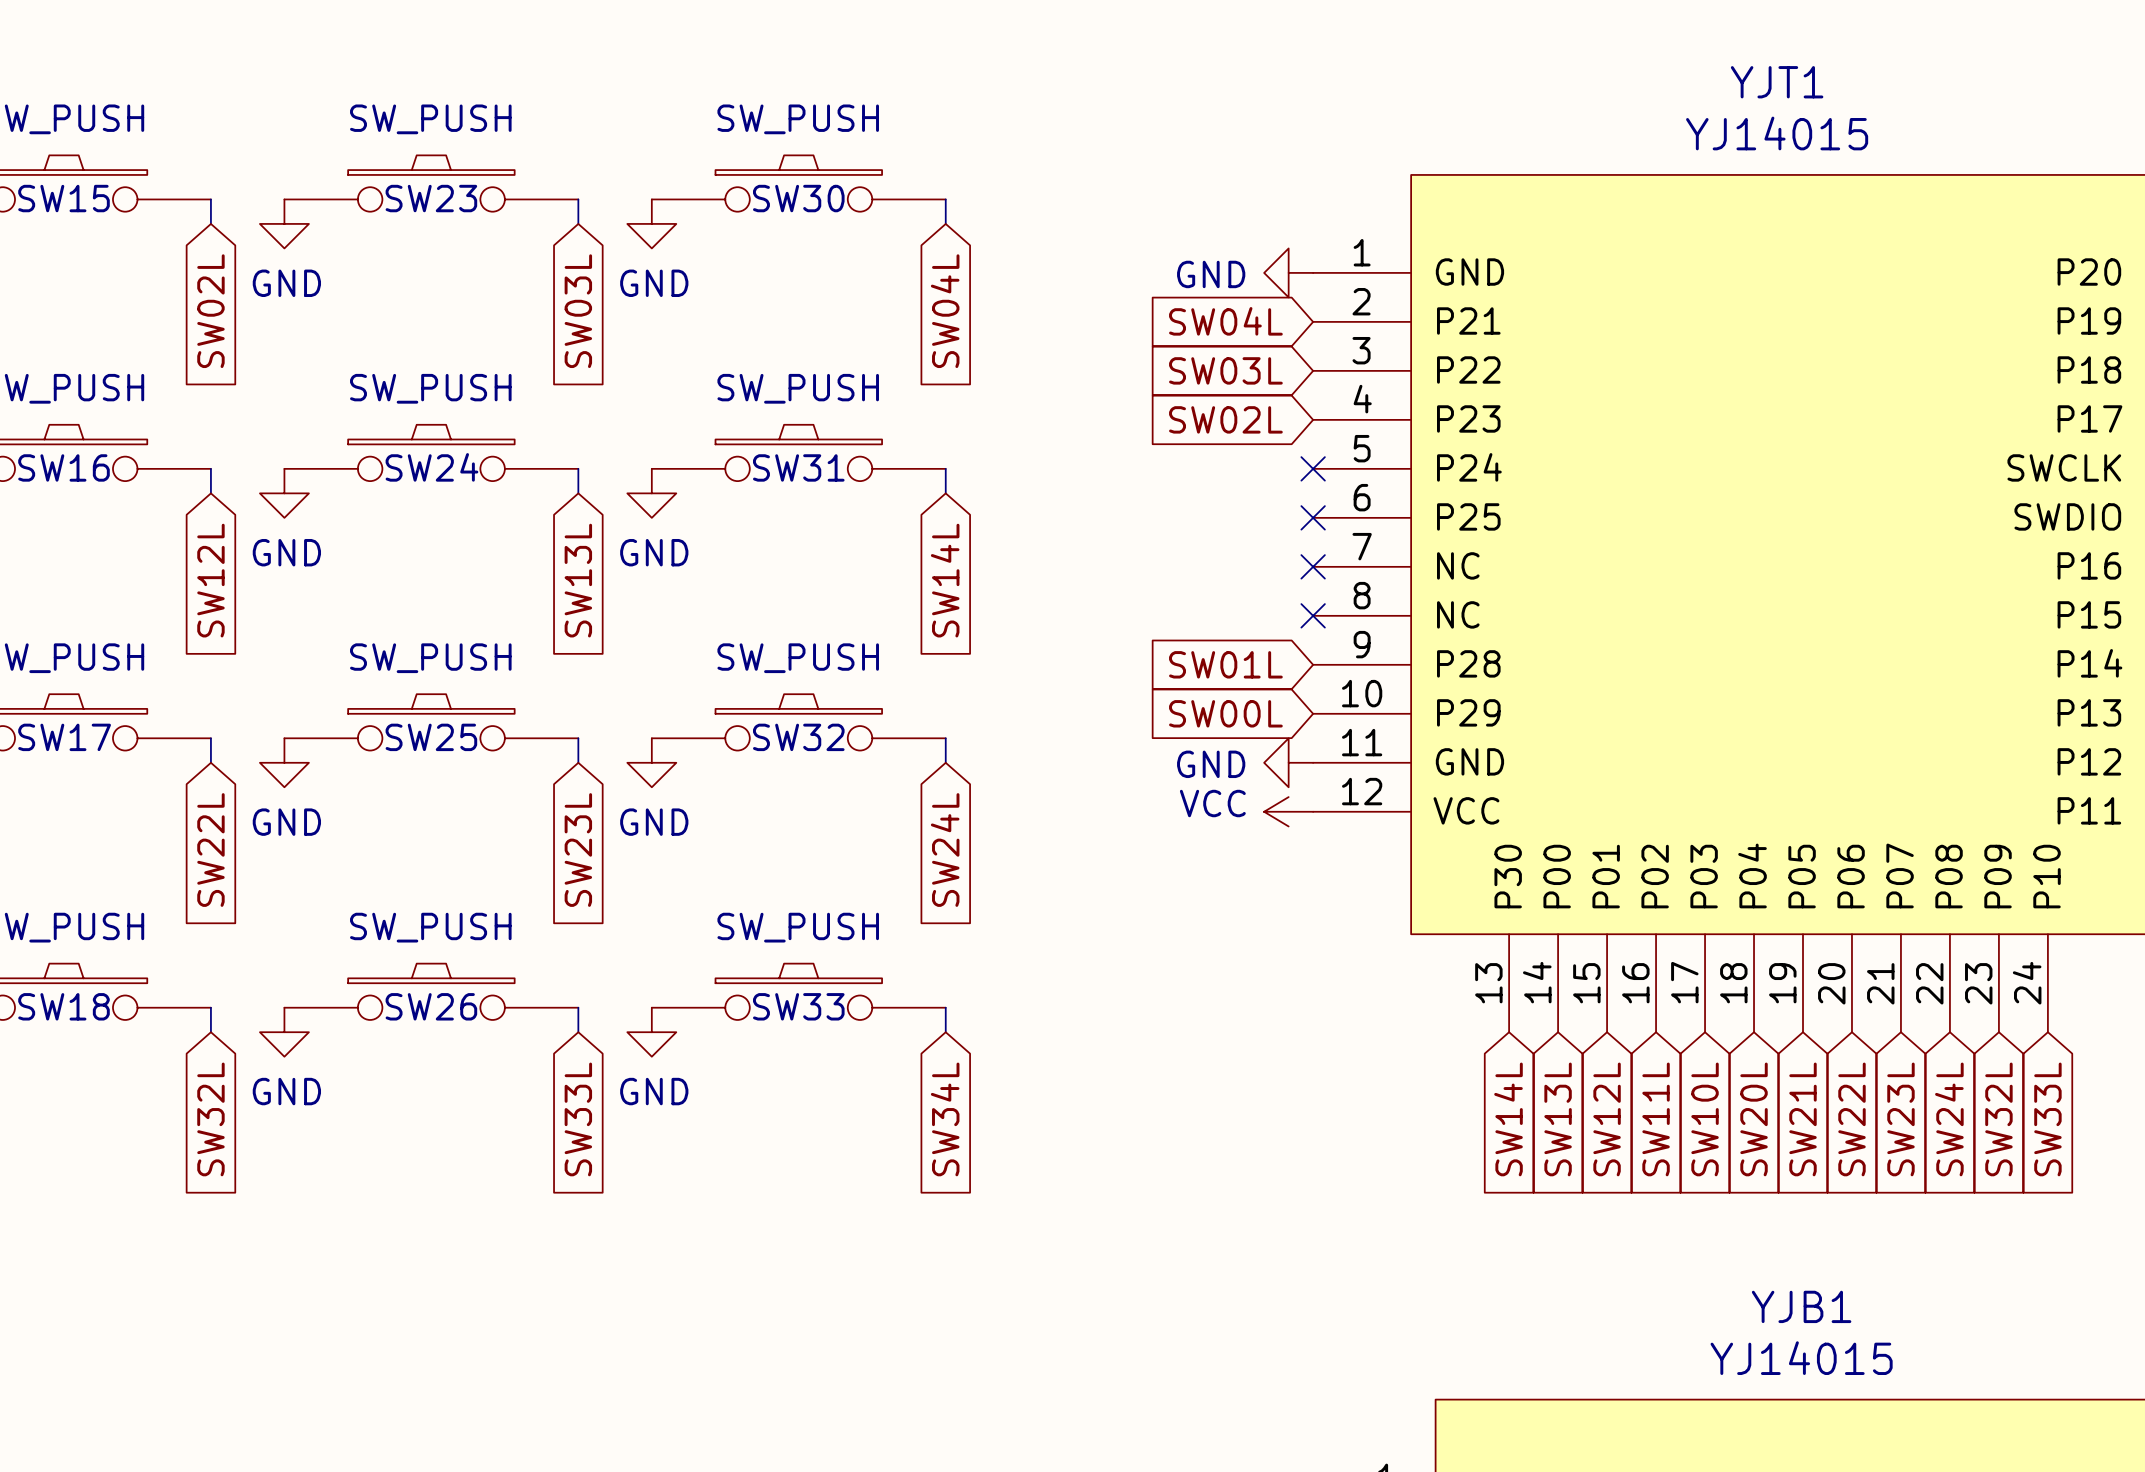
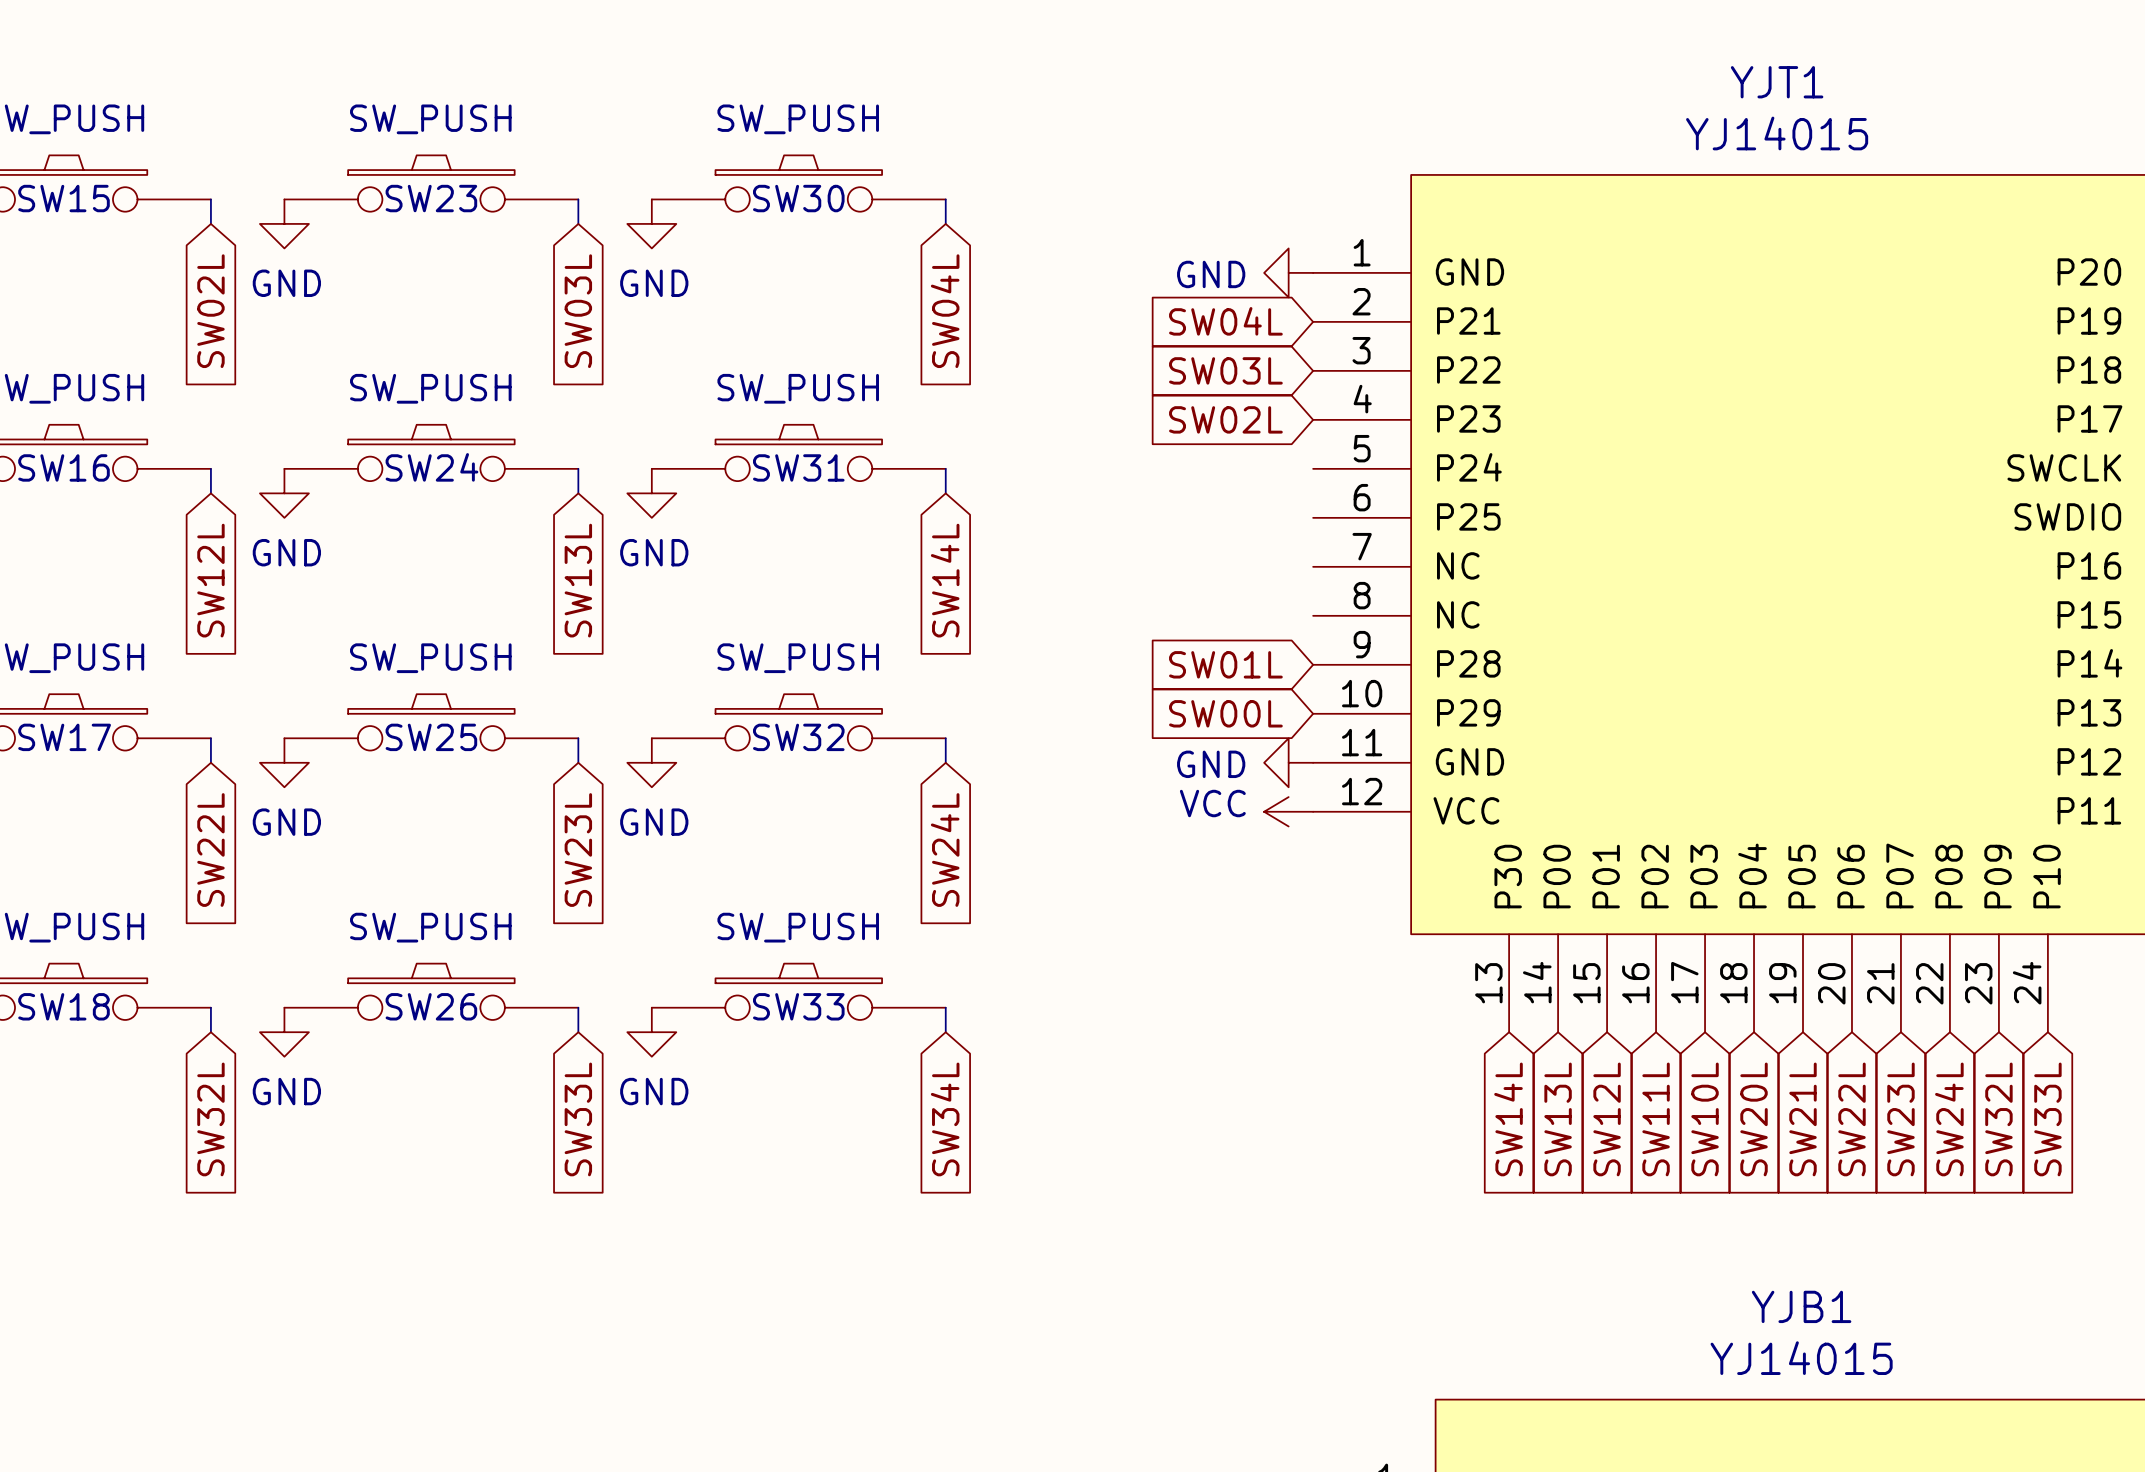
no-connect mark: (1313, 468) -> none
no-connect mark: (1313, 517) -> none
no-connect mark: (1313, 566) -> none
no-connect mark: (1313, 615) -> none

